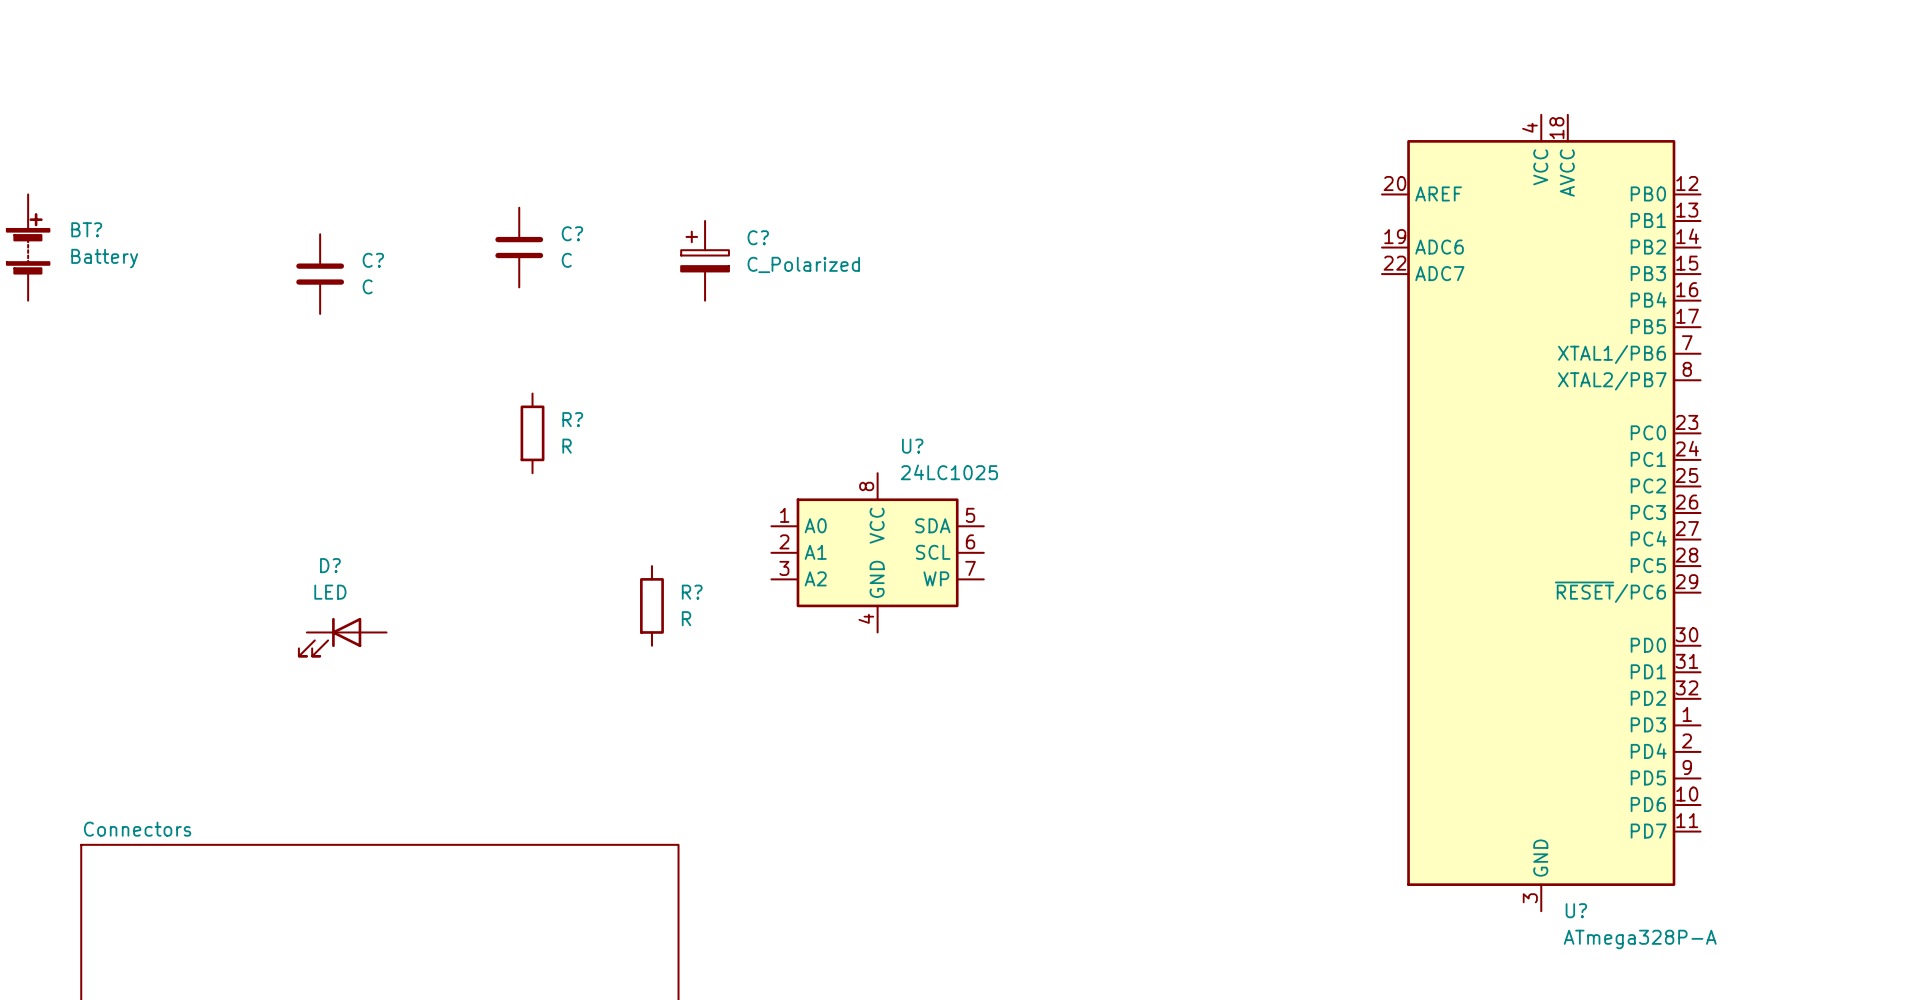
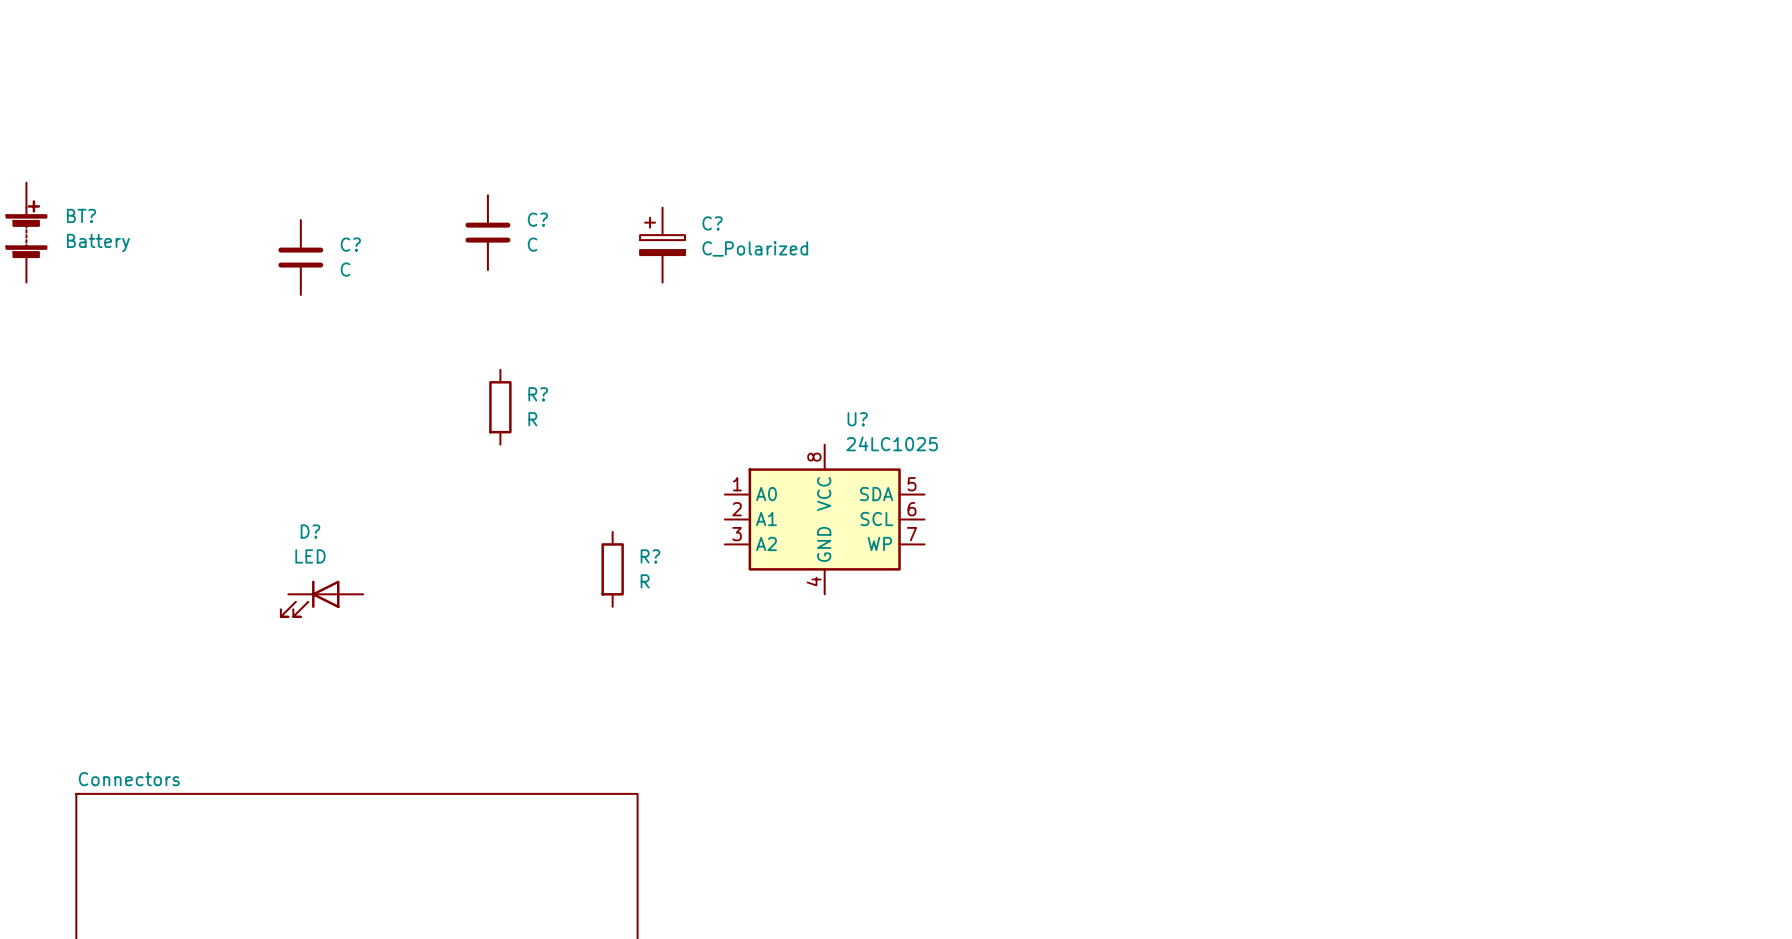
U?: ATmega328P-A (1541, 513) -> none

